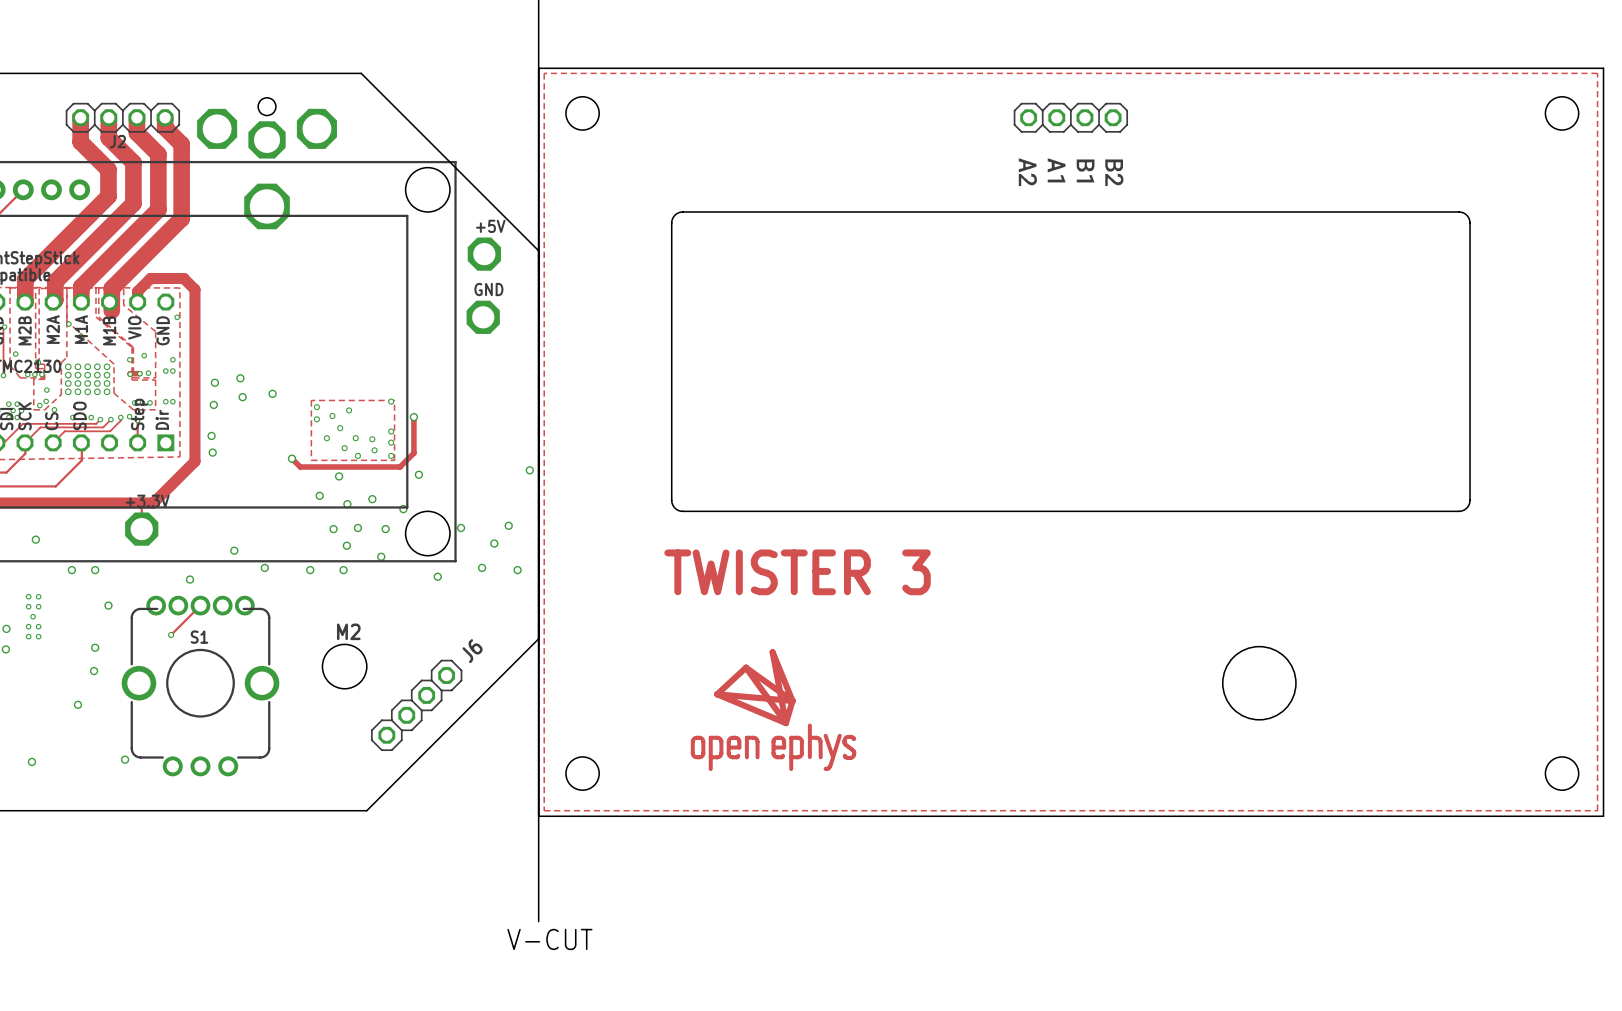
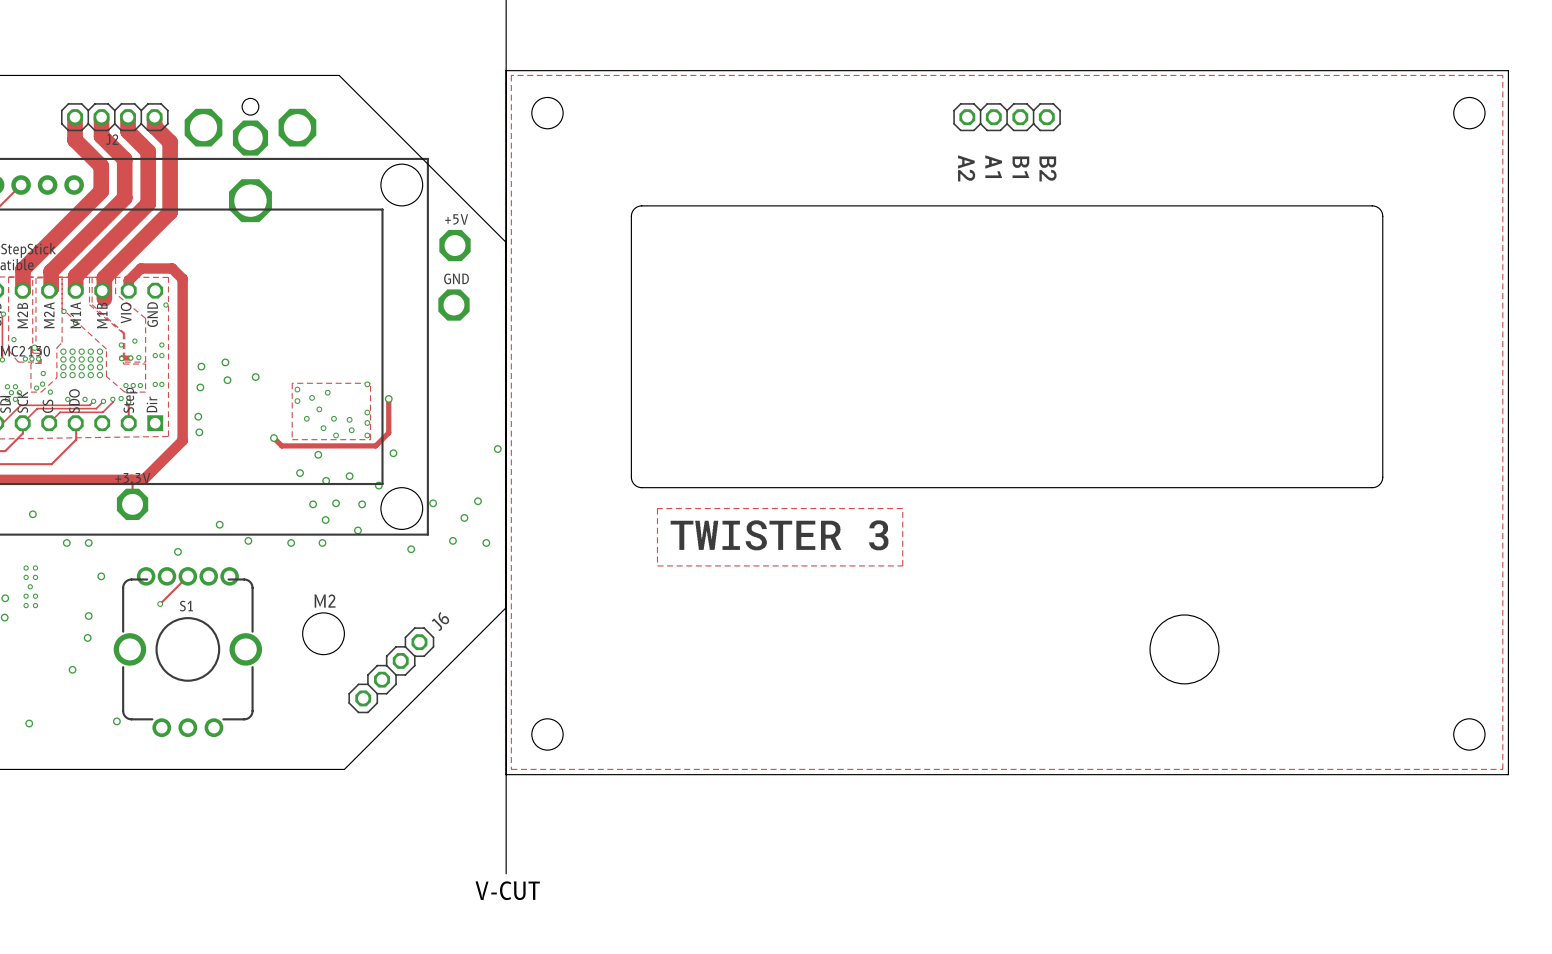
zone outline: none -> (657, 508) (657, 565) (902, 565) (902, 508) (657, 508)
drawing: none -> [670, 520, 842, 551]
drawing: none -> [869, 520, 889, 551]
text: TWISTER 3 (797, 572) -> none
drawing: [690, 649, 857, 772] -> none

